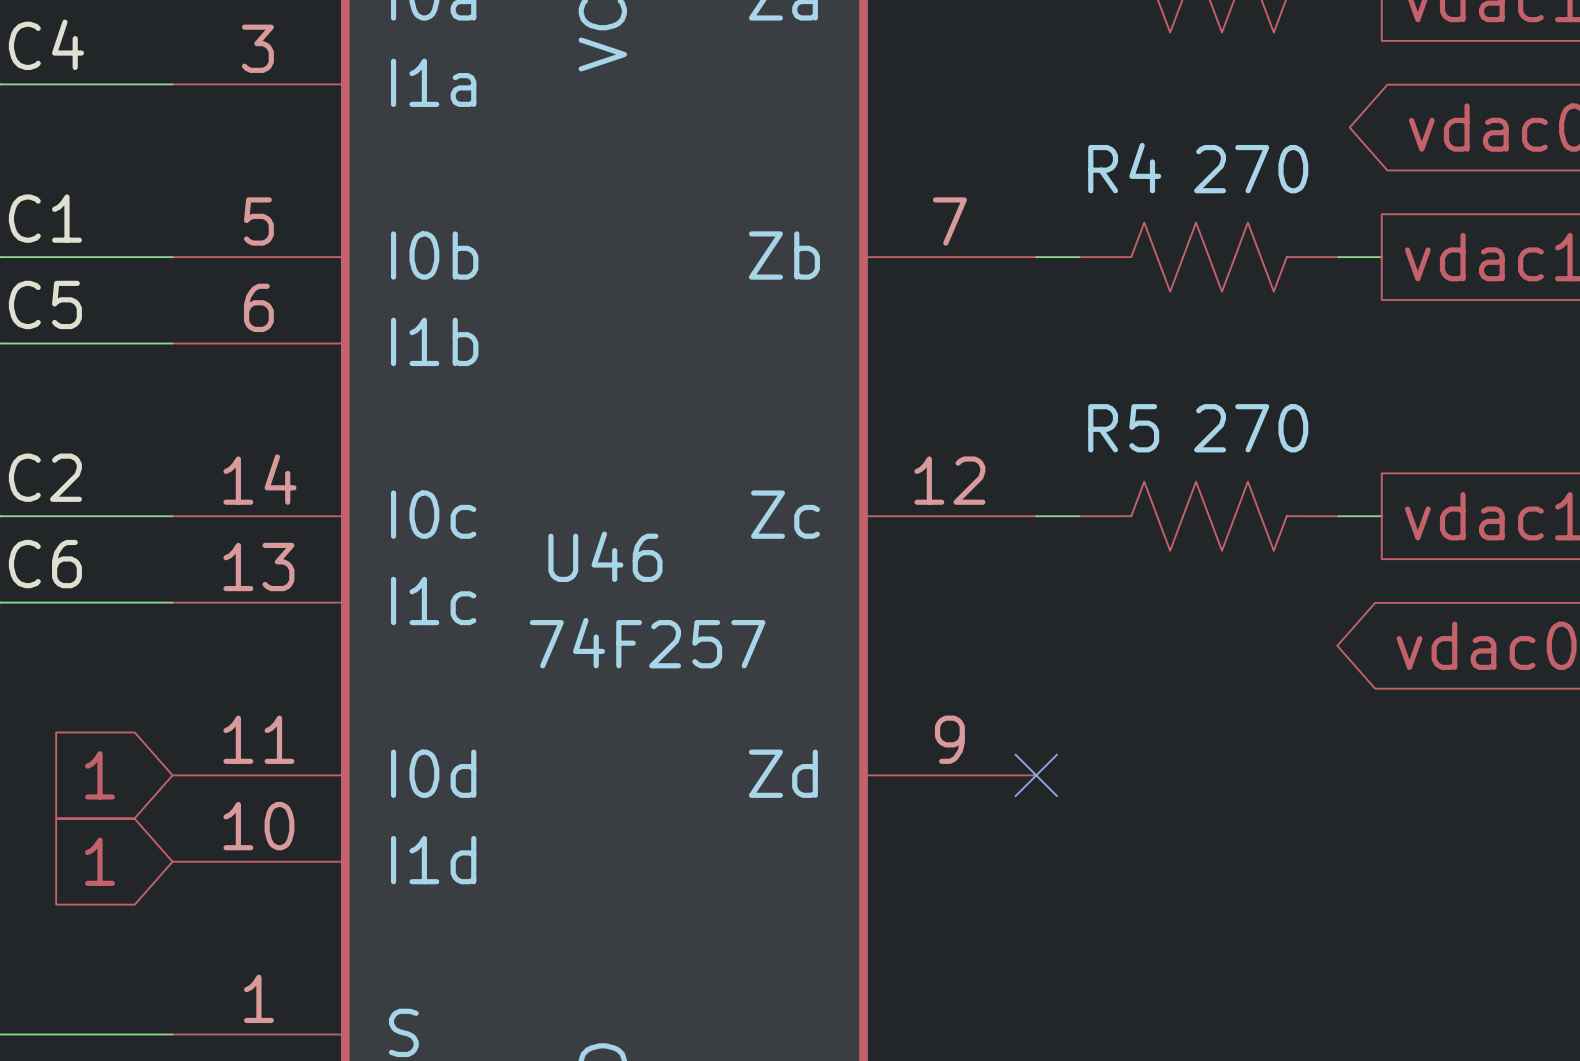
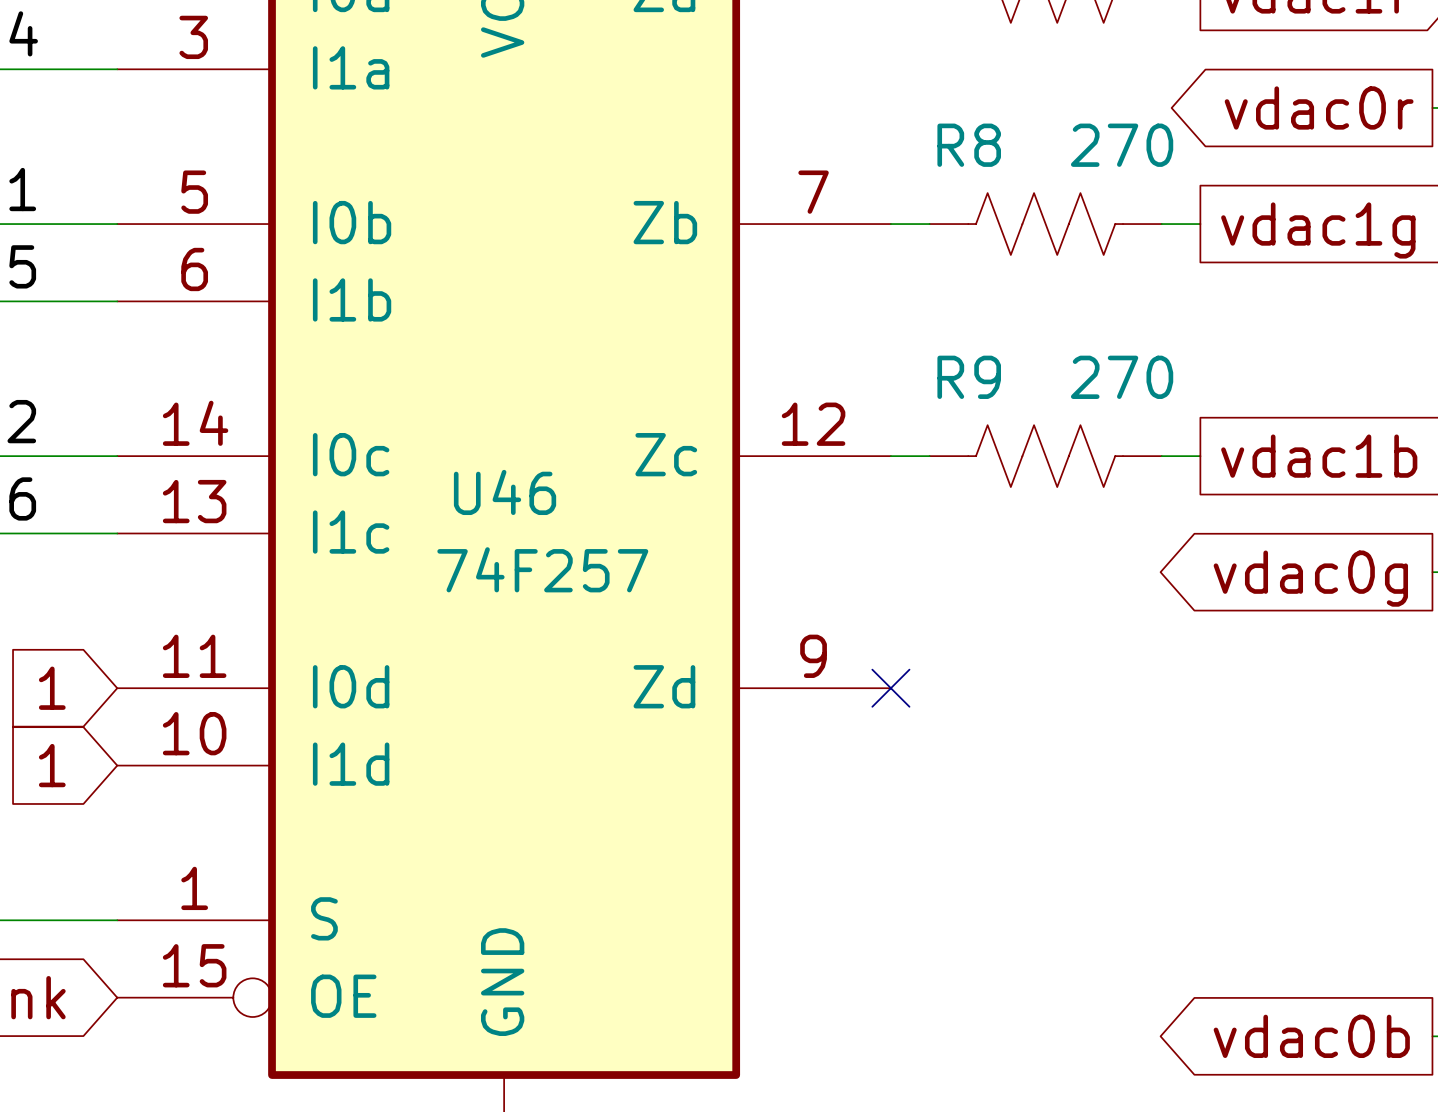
R4 name: R4 (1124, 168) -> R8 (969, 145)
R4 value position: 270 (1251, 169) -> 270 (1122, 145)
R5 name: R5 (1123, 428) -> R9 (969, 377)
R5 value position: 270 (1251, 428) -> 270 (1122, 377)

